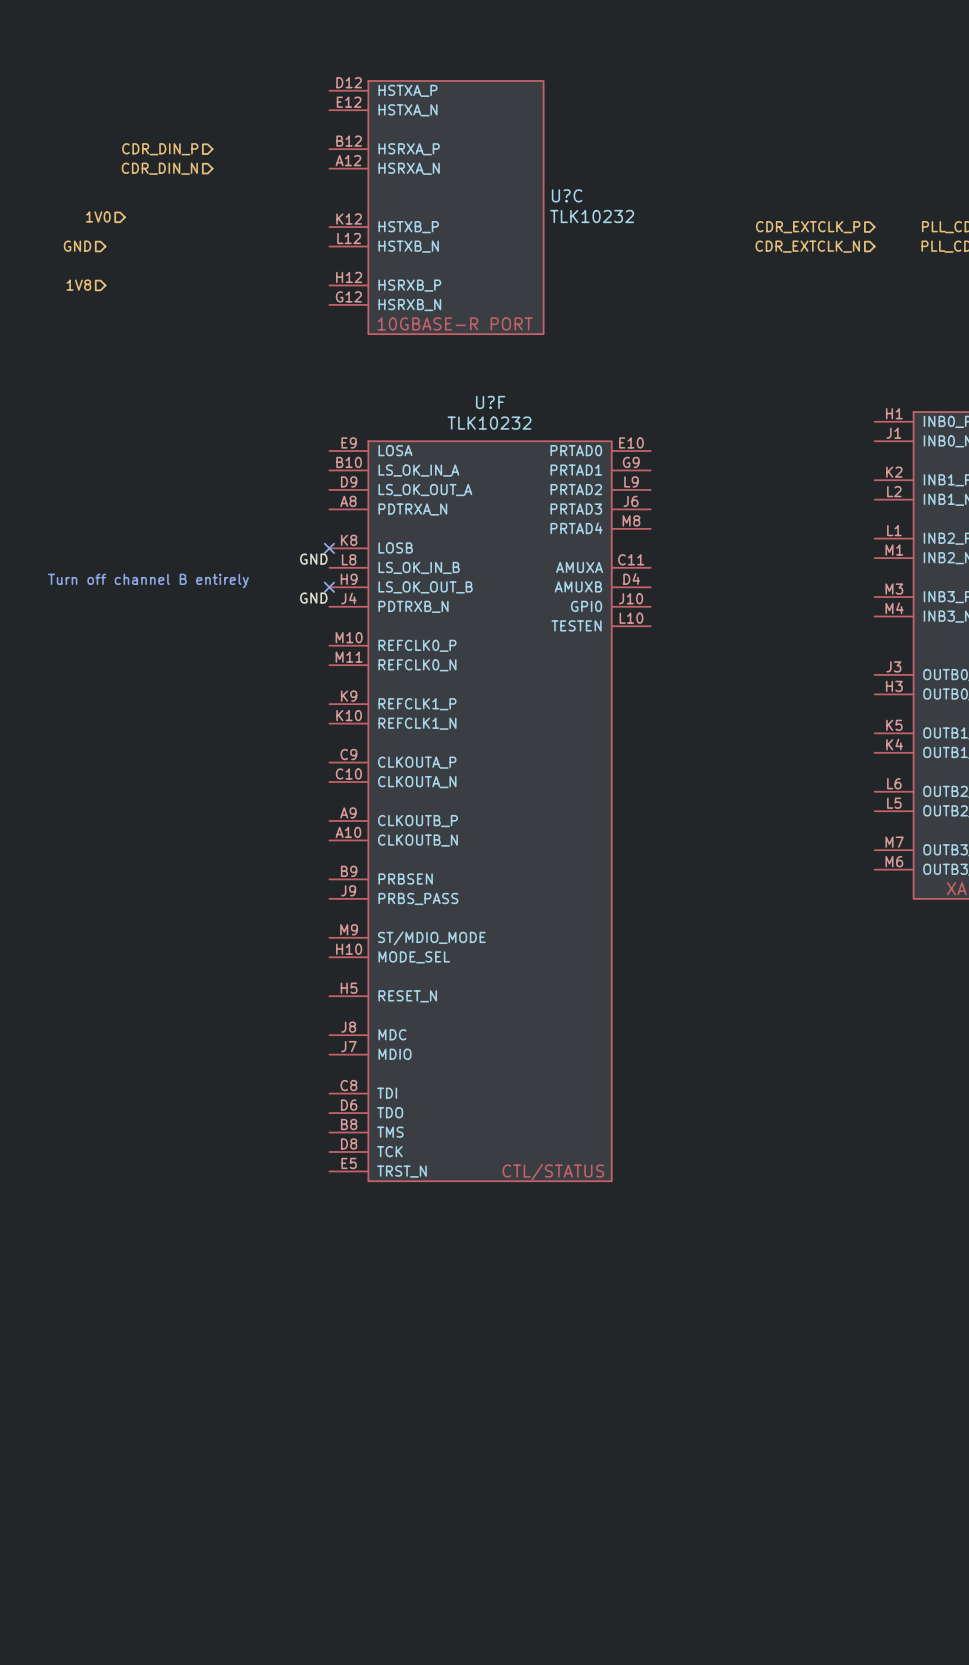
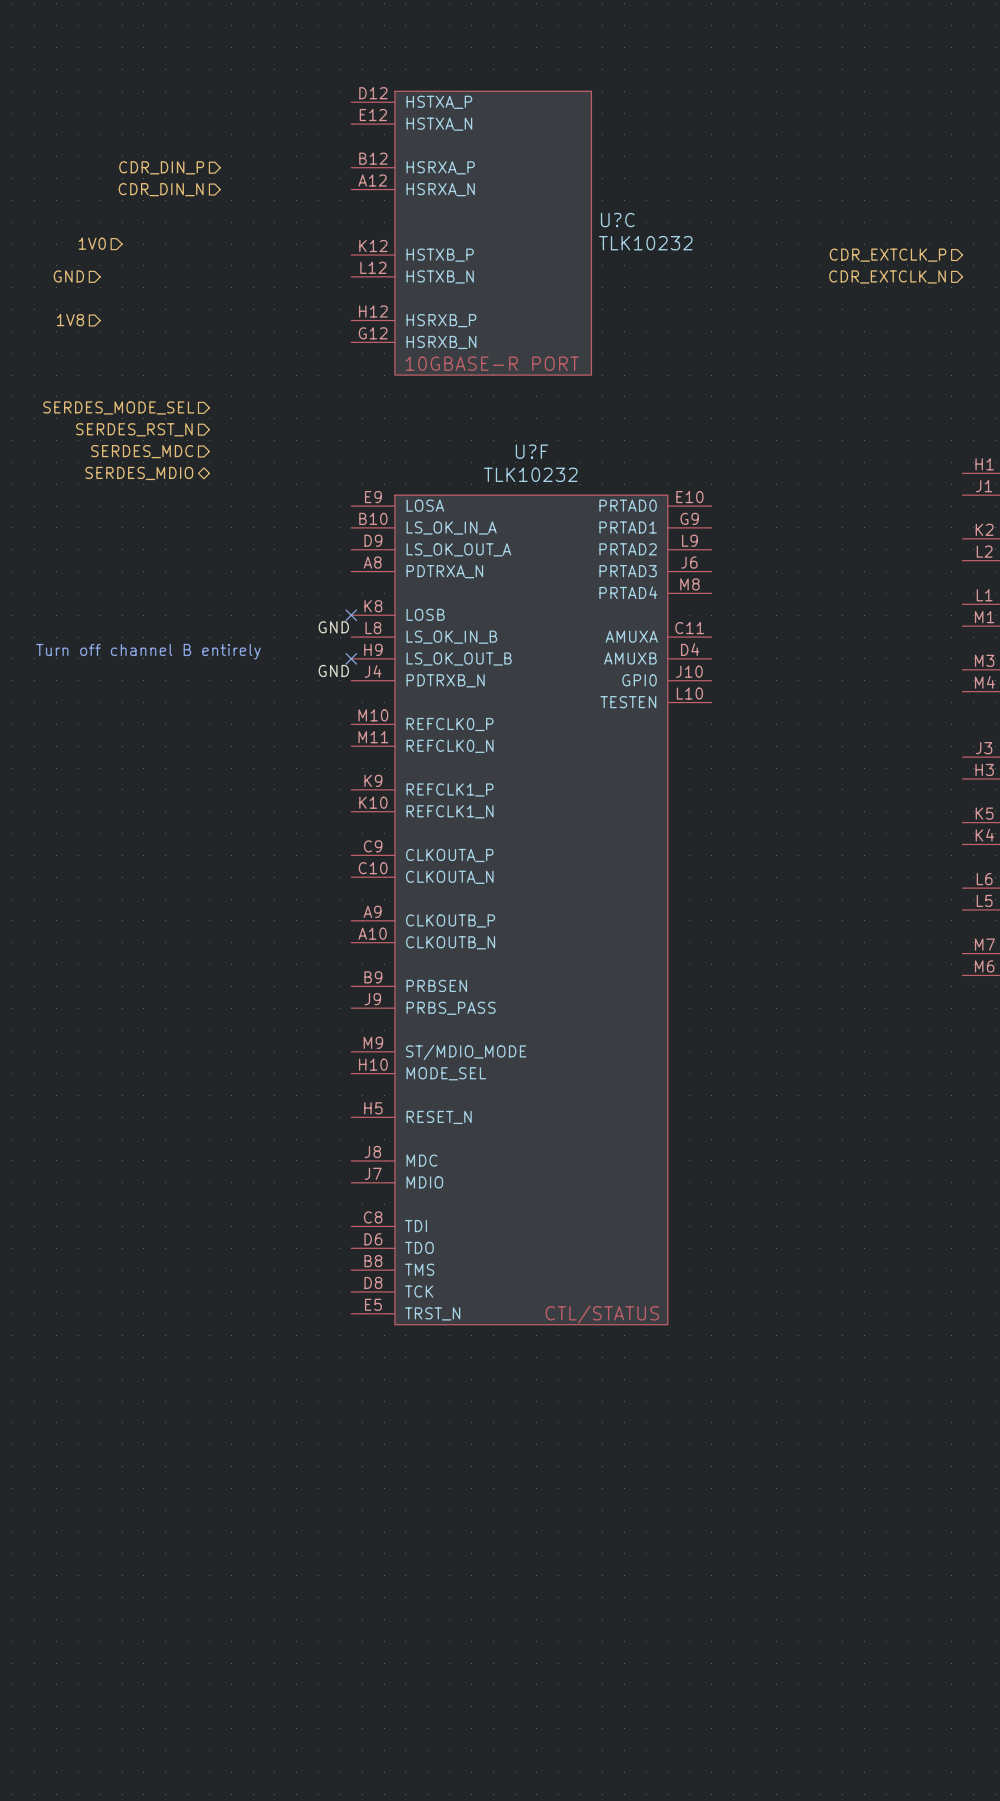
hierarchical label: none -> SERDES_MODE_SEL (118, 407)
hierarchical label: none -> SERDES_RST_N (134, 429)
hierarchical label: none -> SERDES_MDC (142, 451)
hierarchical label: none -> SERDES_MDIO (139, 473)

